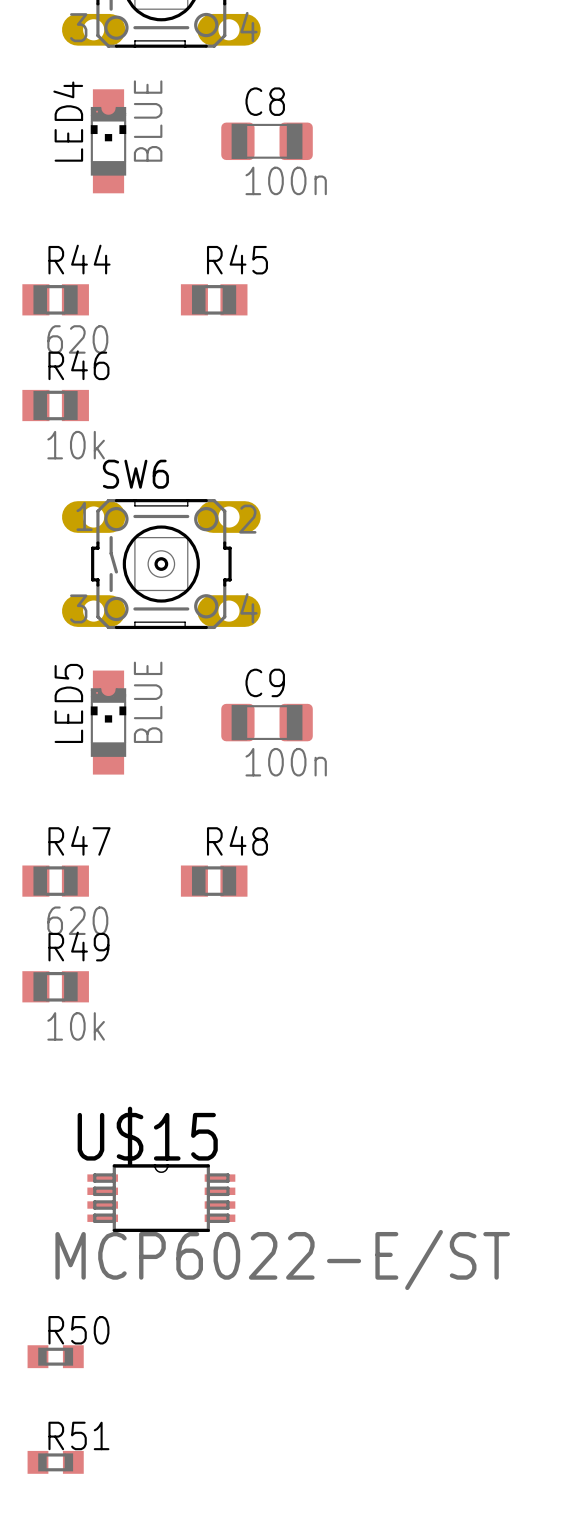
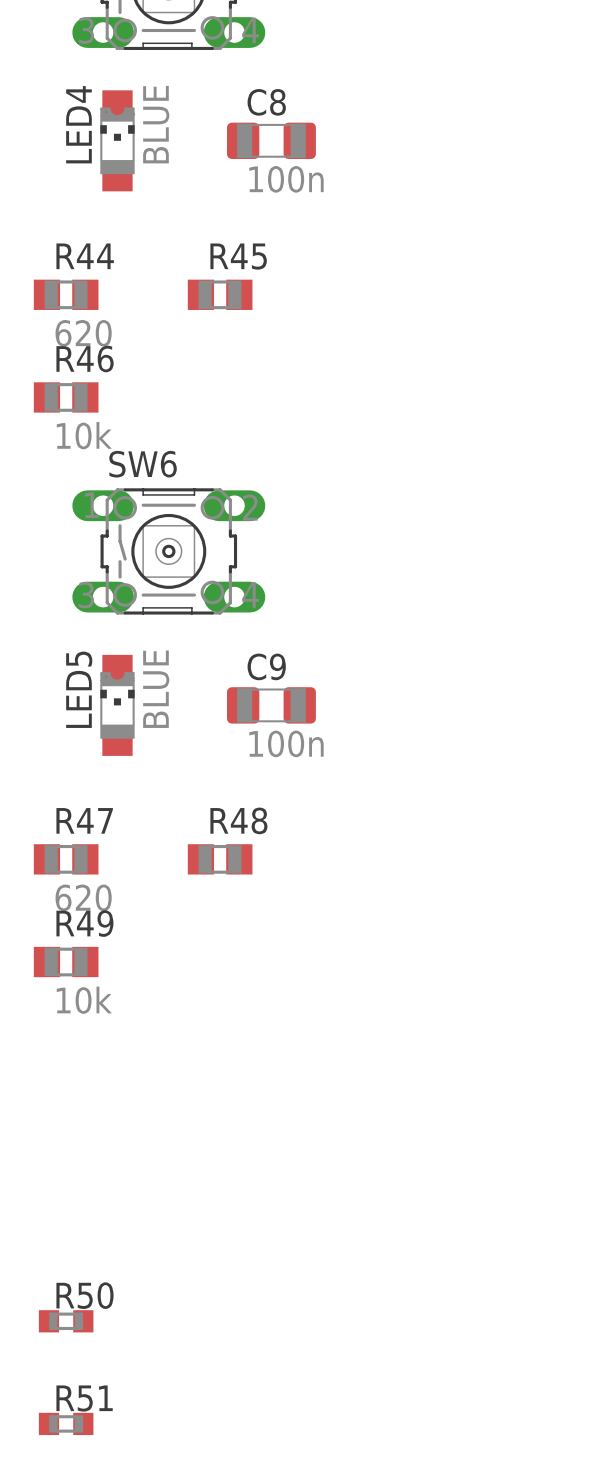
U$15: MCP6022-E/ST (161, 1198) -> none

